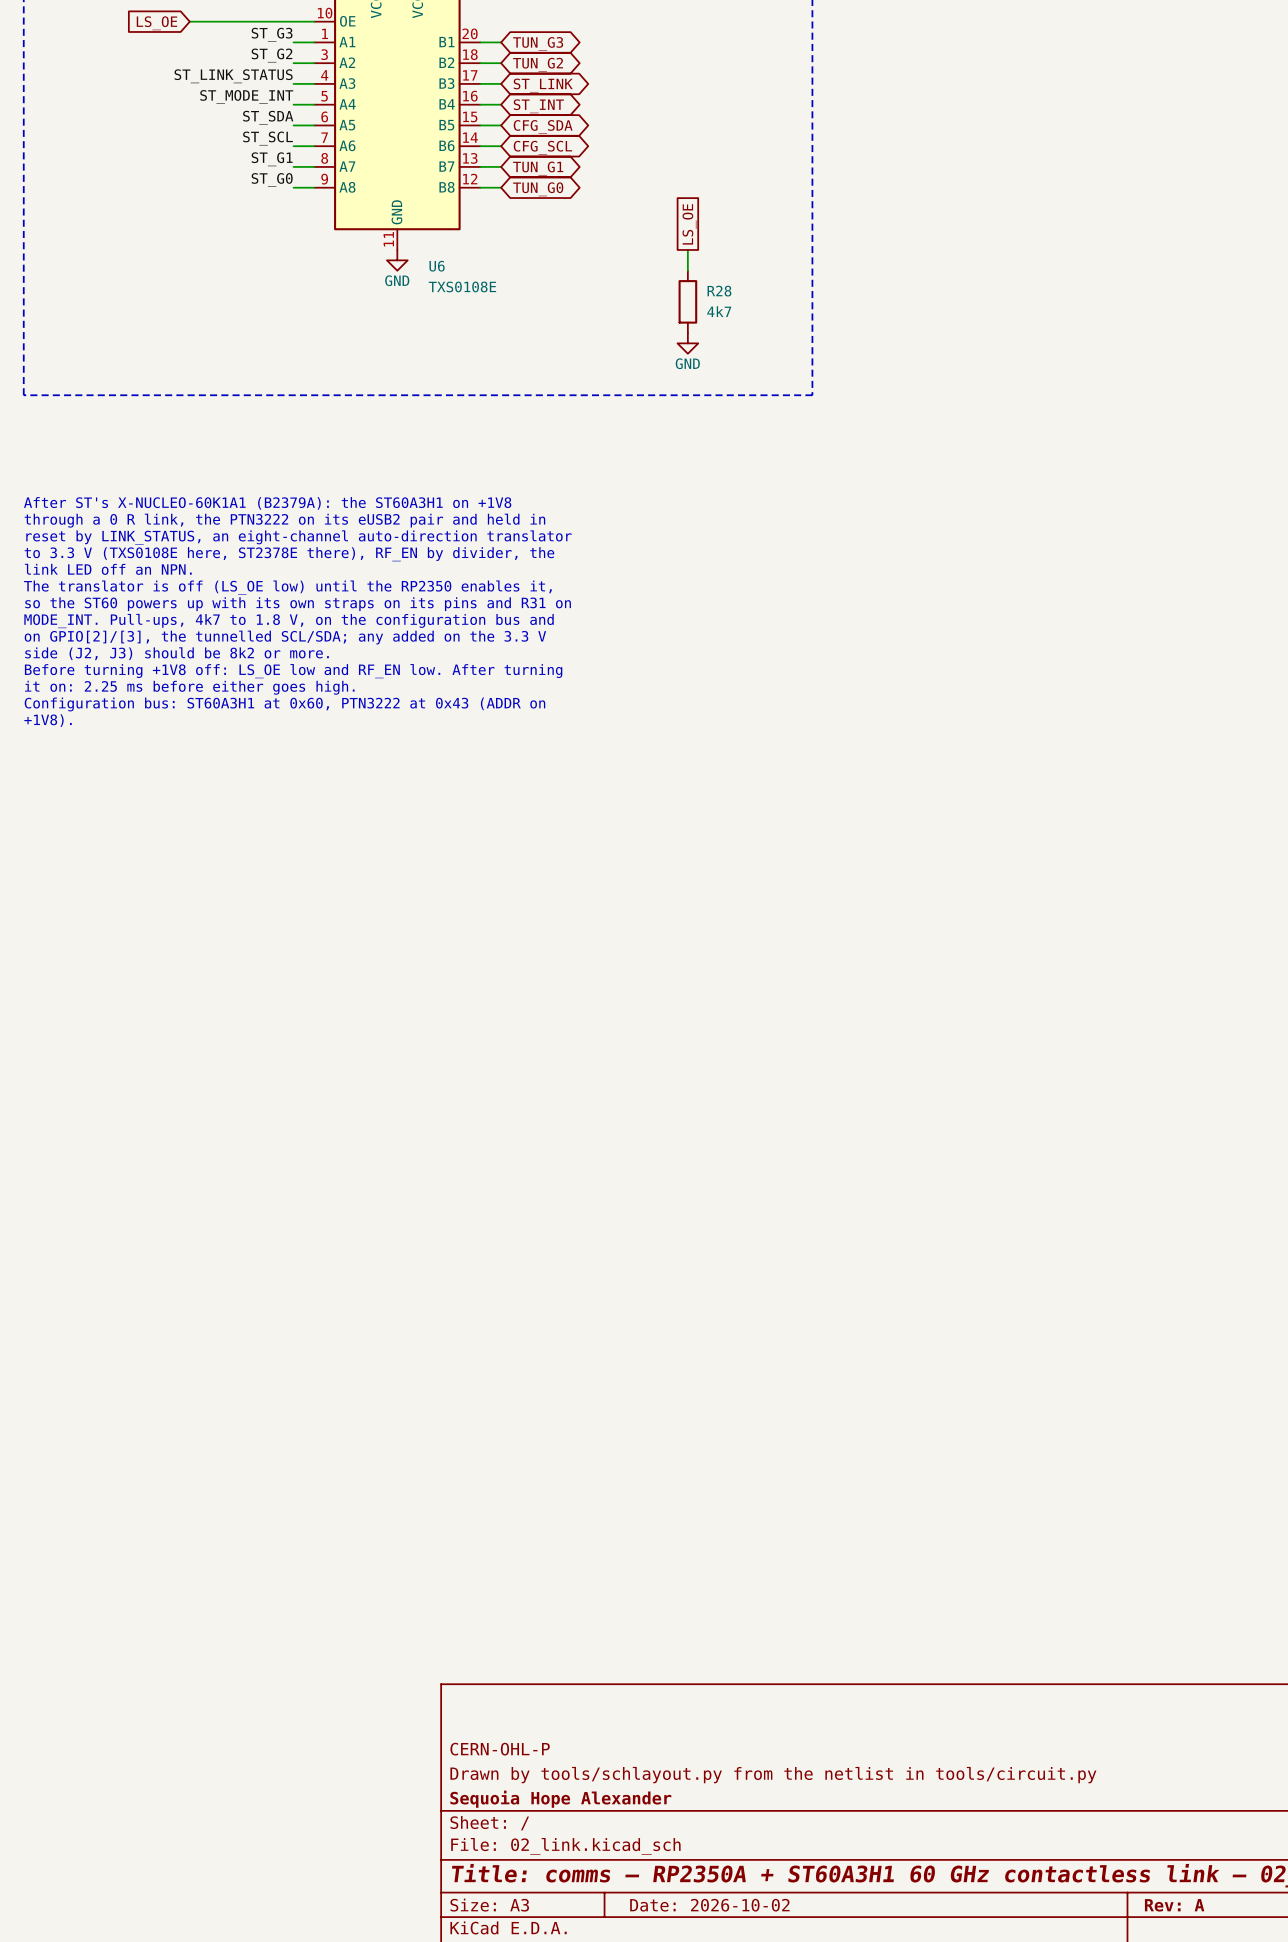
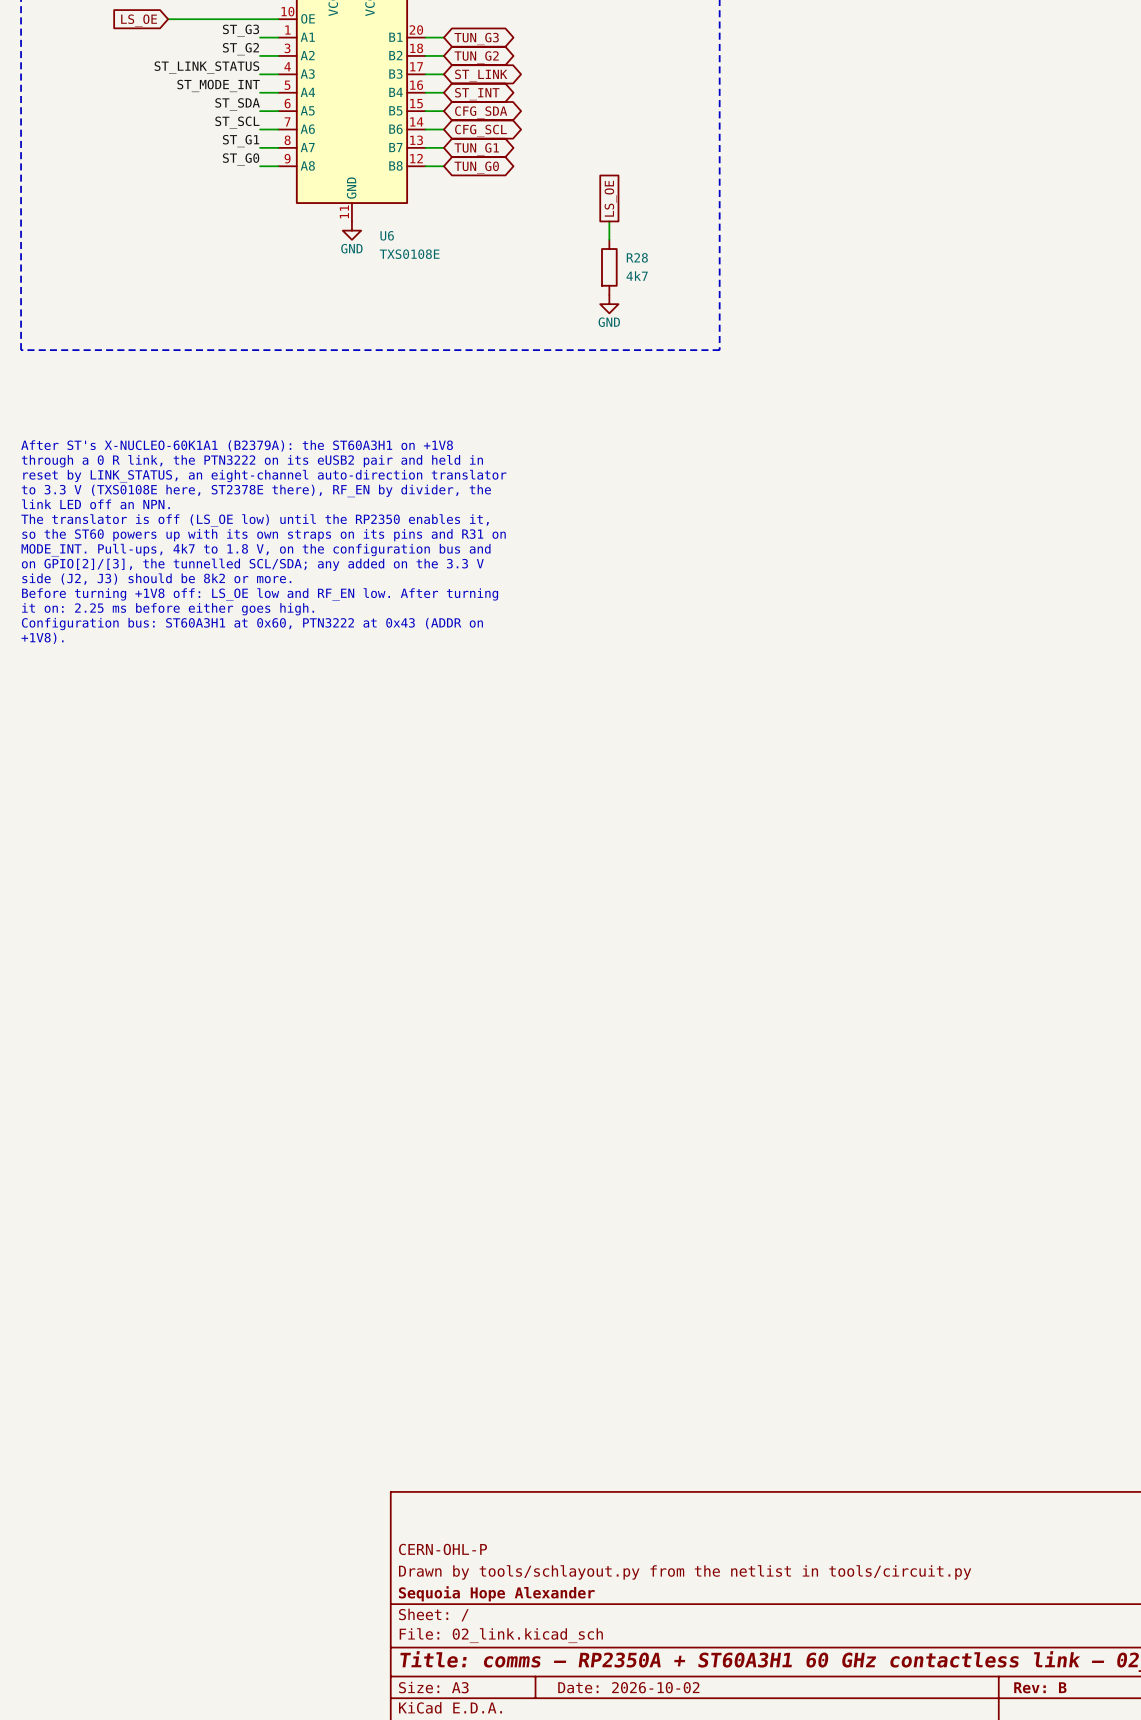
title block: Rev: A (1174, 1905) -> Rev: B (1040, 1687)

